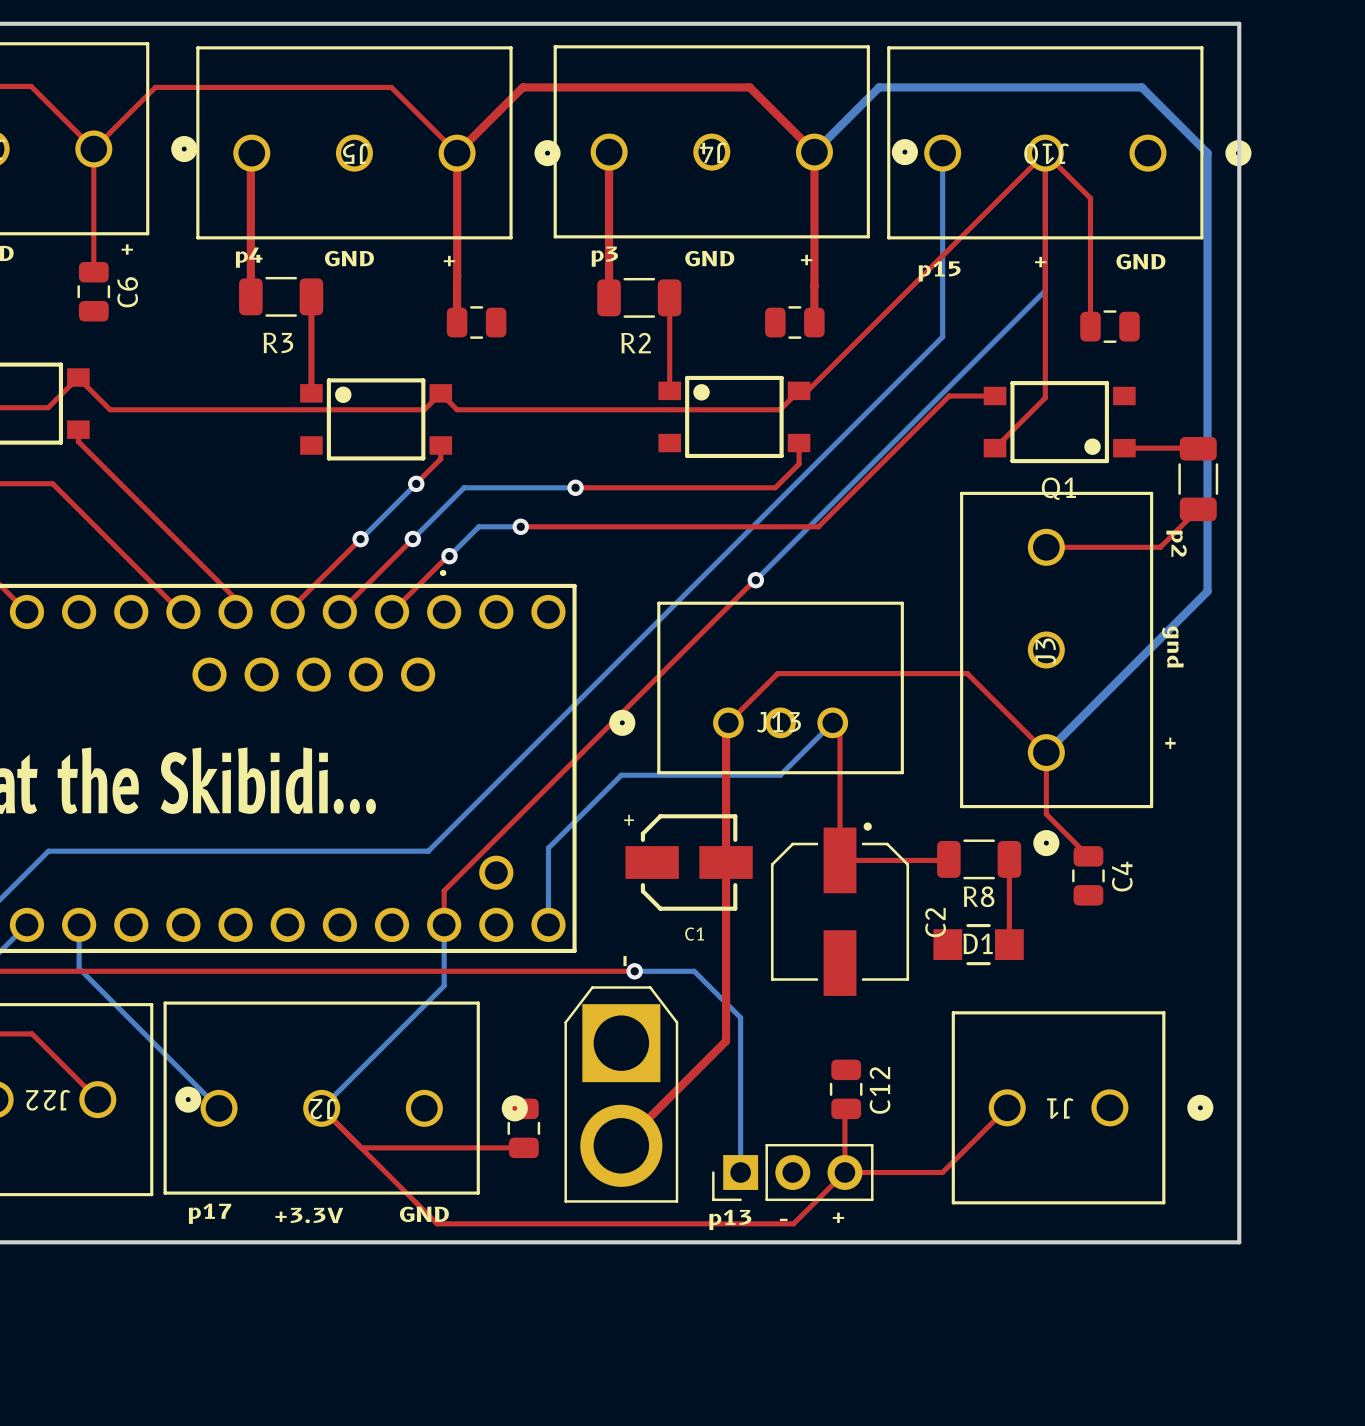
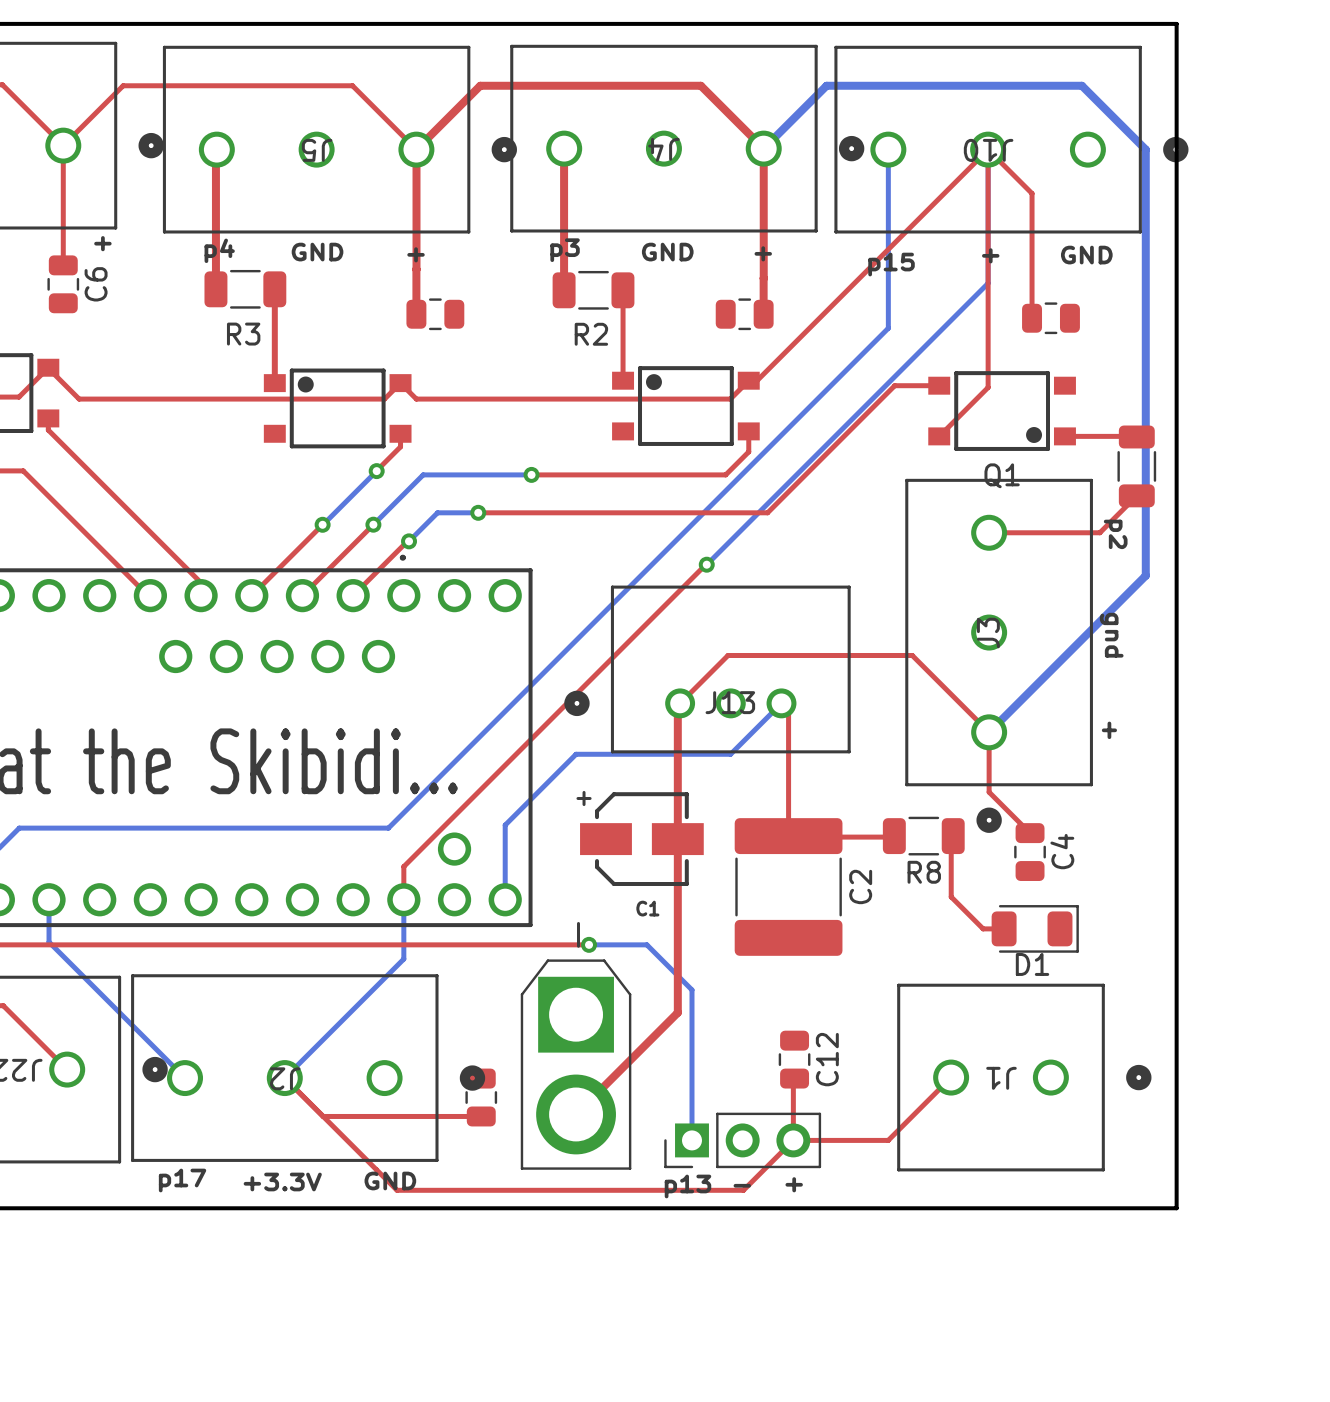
C2 footprint: [770, 822, 910, 996] -> [734, 818, 843, 956]
top track: (1009, 859) (1009, 944) -> (953, 836) (951, 838) (951, 896) (983, 928) (1004, 928)
D1 footprint: [933, 924, 1024, 966] -> [991, 905, 1079, 953]

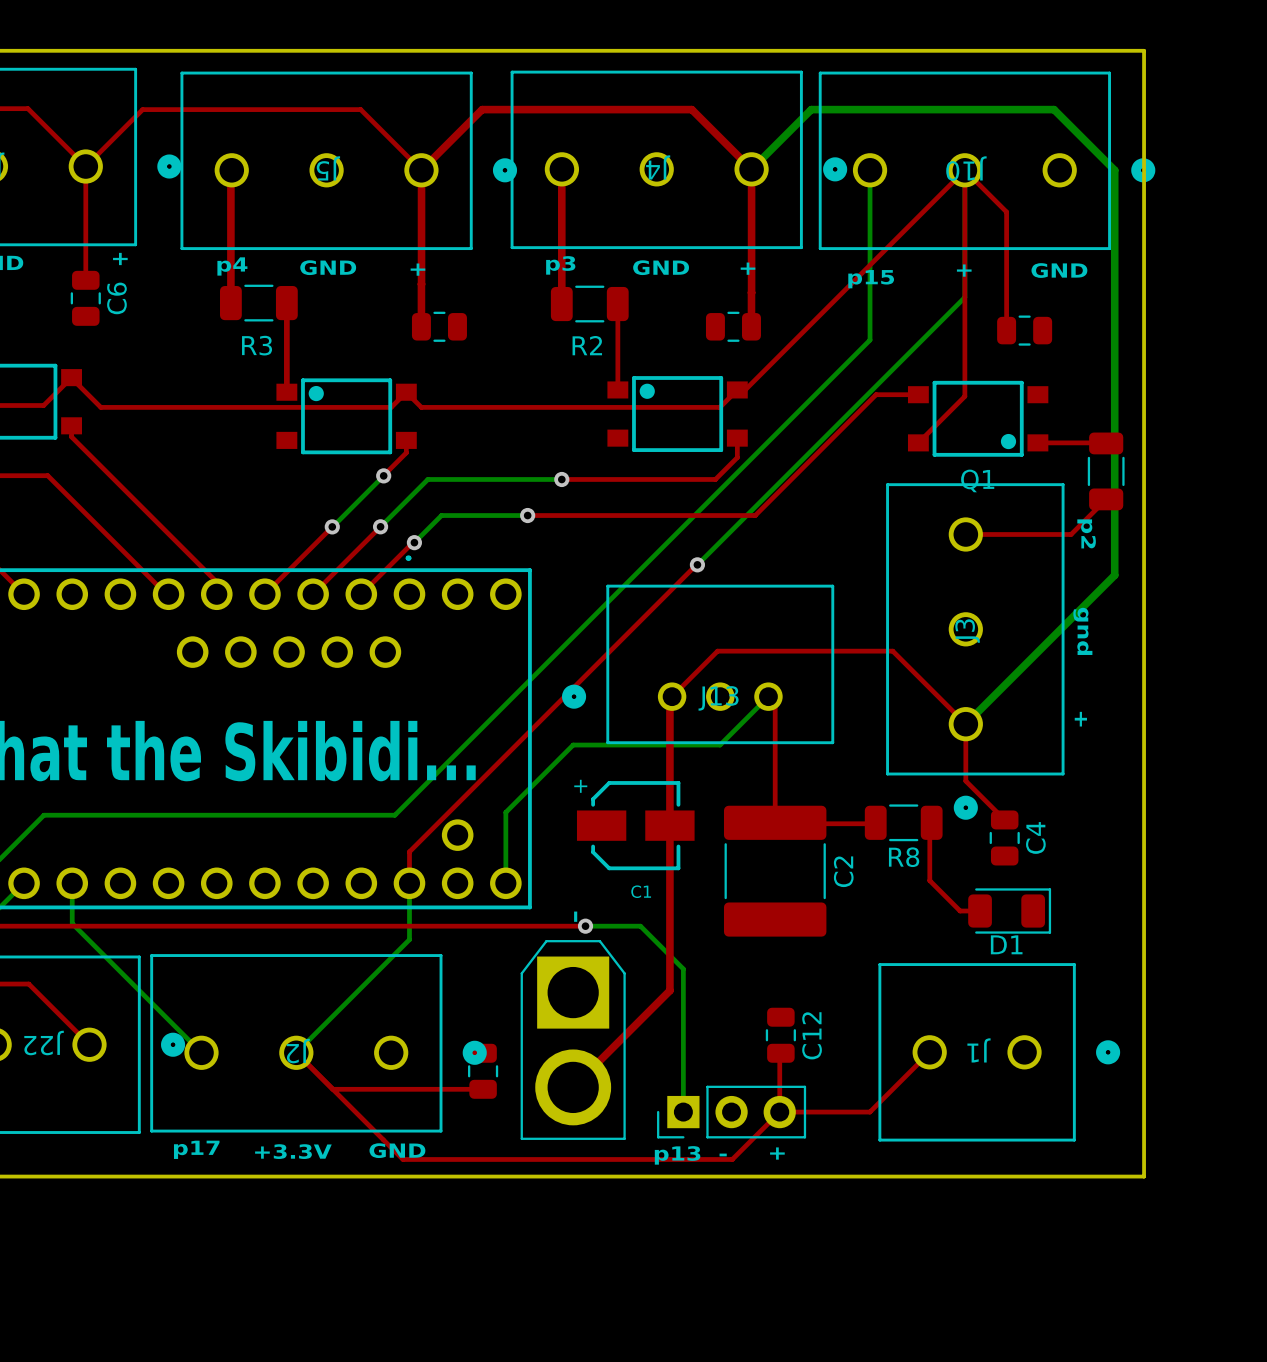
top track: (531, 474) (564, 474) -> none
bottom track: none -> (530, 479) (561, 479)
via: (531, 474) -> none
via: none -> (561, 479)
top track: (478, 512) (528, 512) -> none
bottom track: none -> (480, 515) (527, 515)
via: (478, 512) -> none
via: none -> (527, 515)

